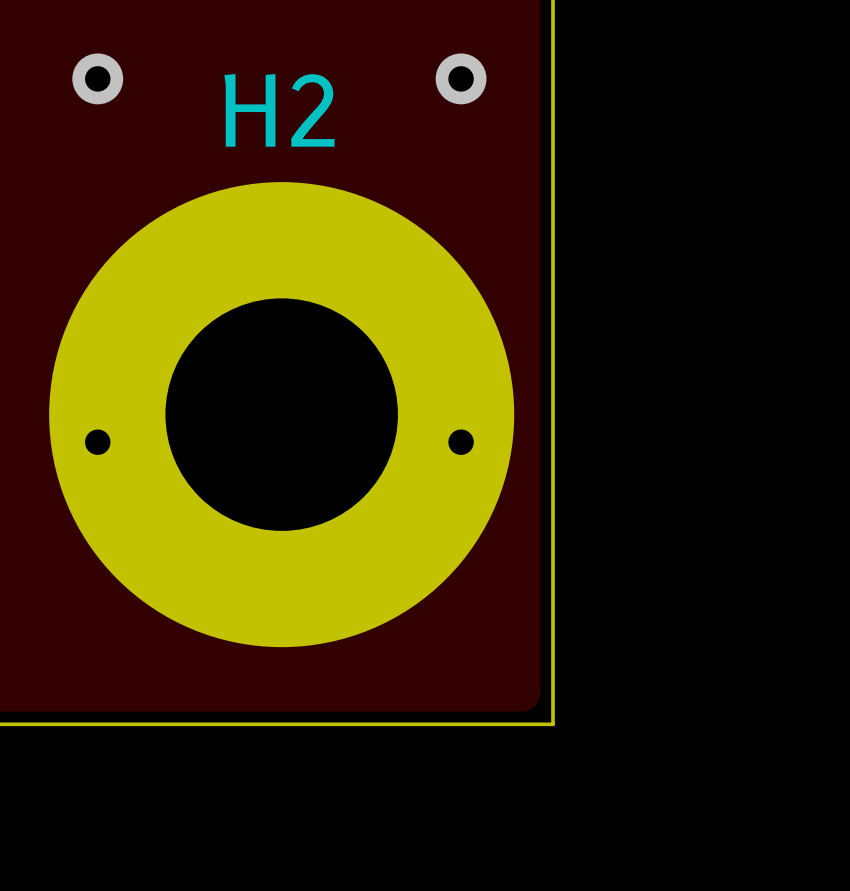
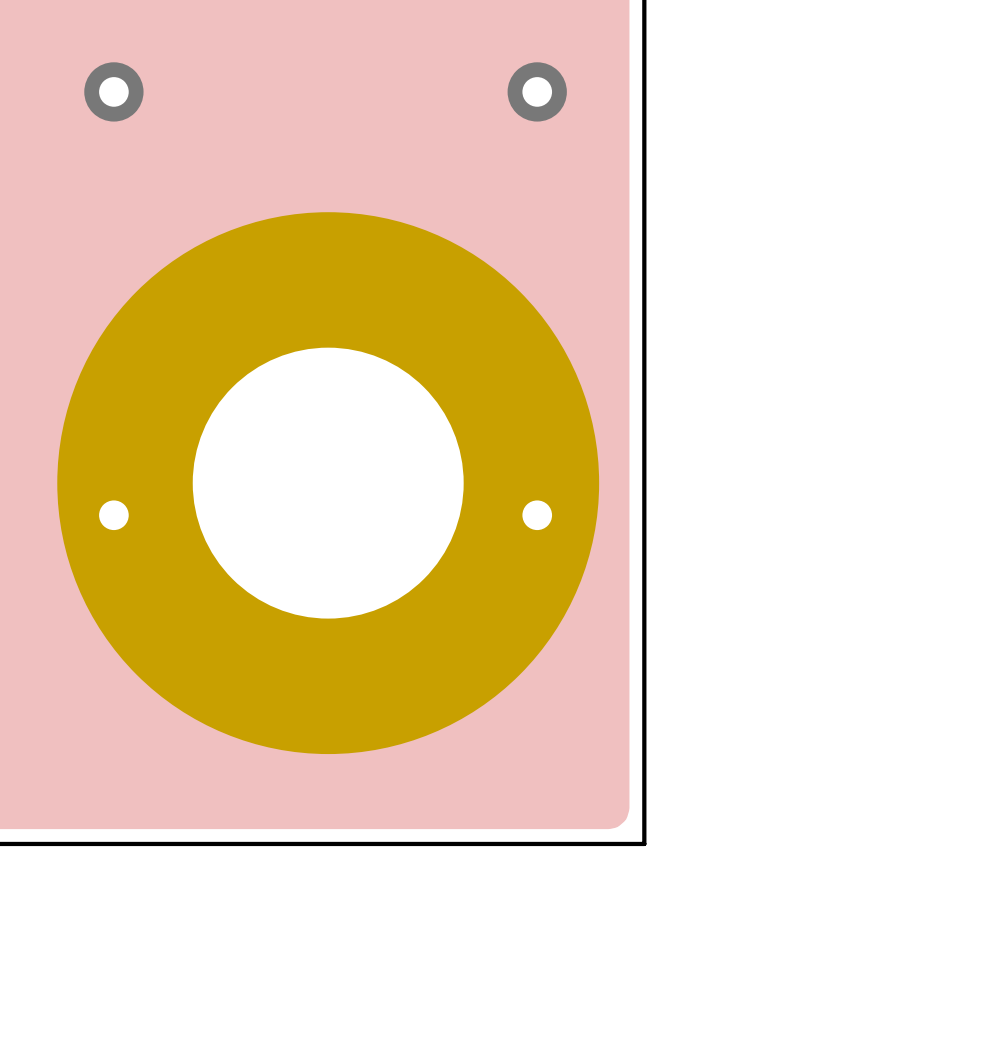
H2 name: H2 (279, 110) -> none

